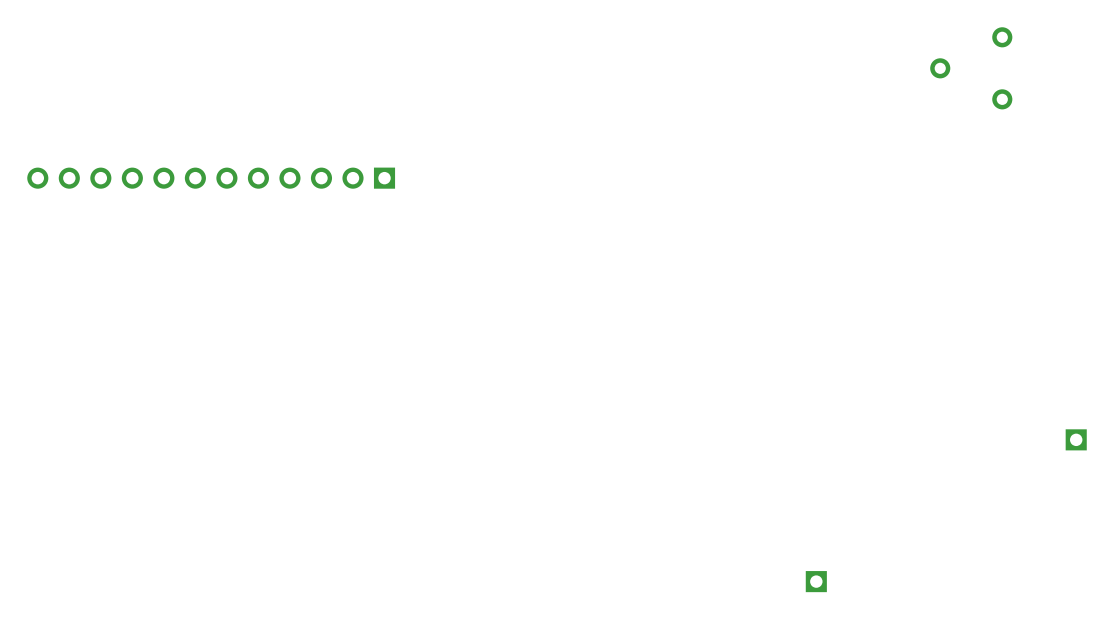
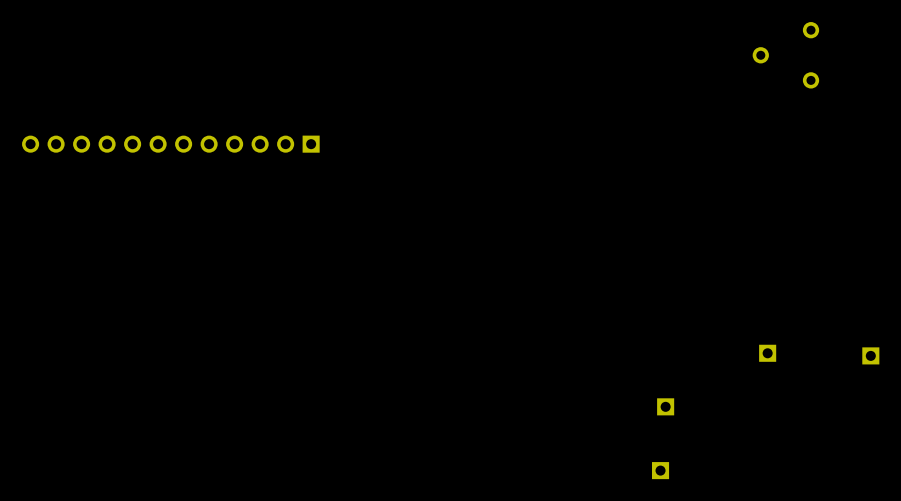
part: none -> (767, 353)
part: none -> (665, 406)

